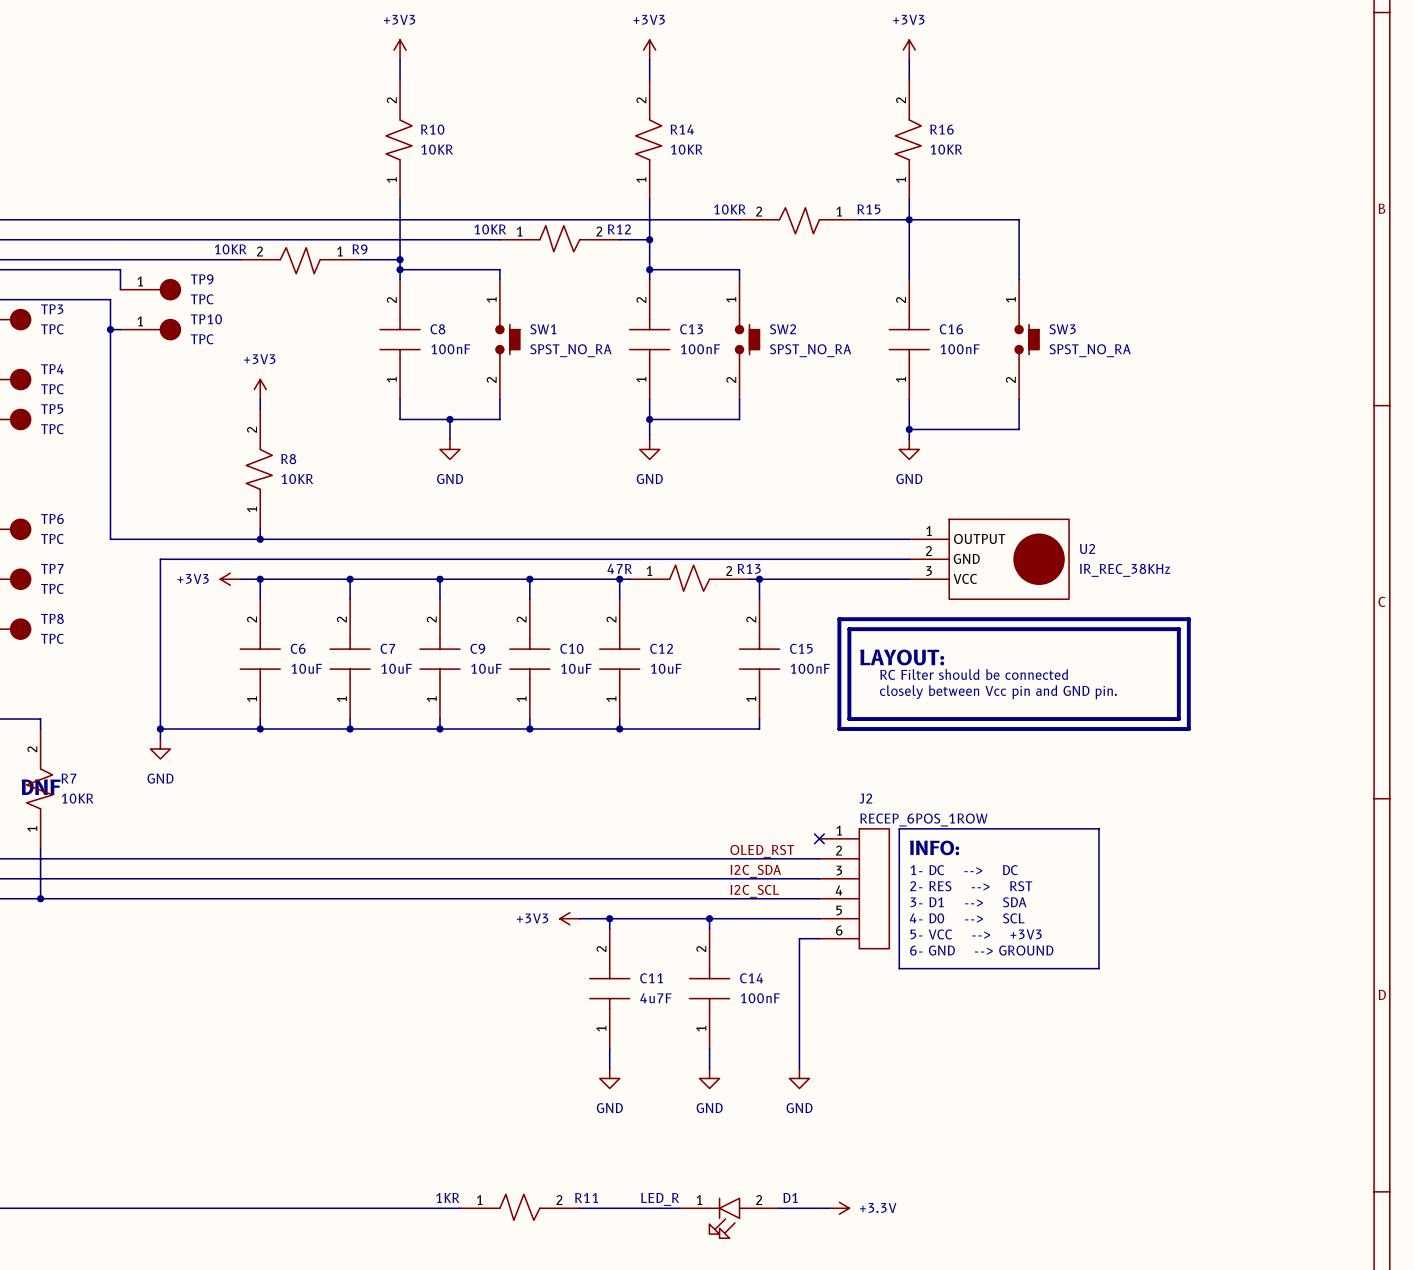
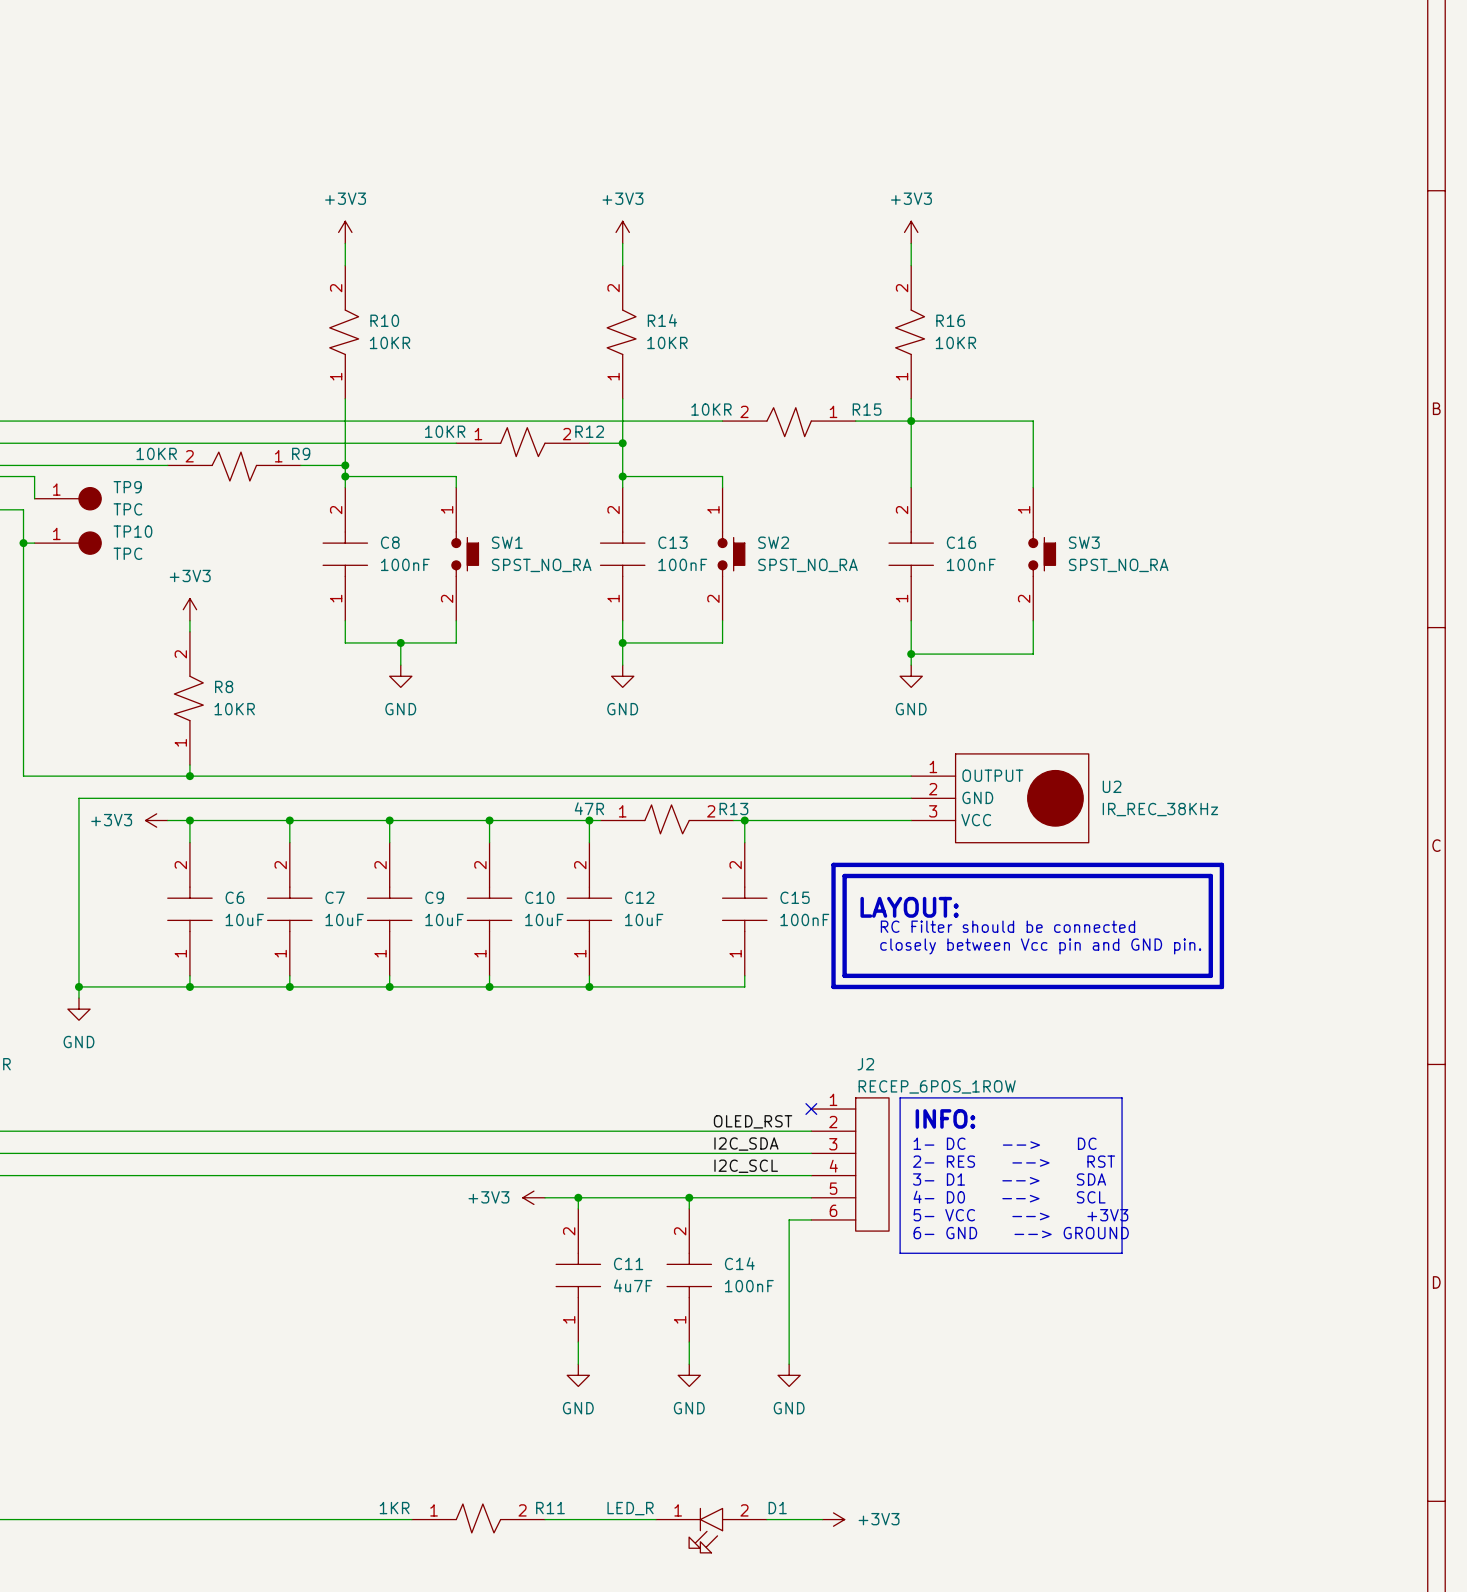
power symbol: +3.3V (839, 1208) -> +3V3 (833, 1519)

